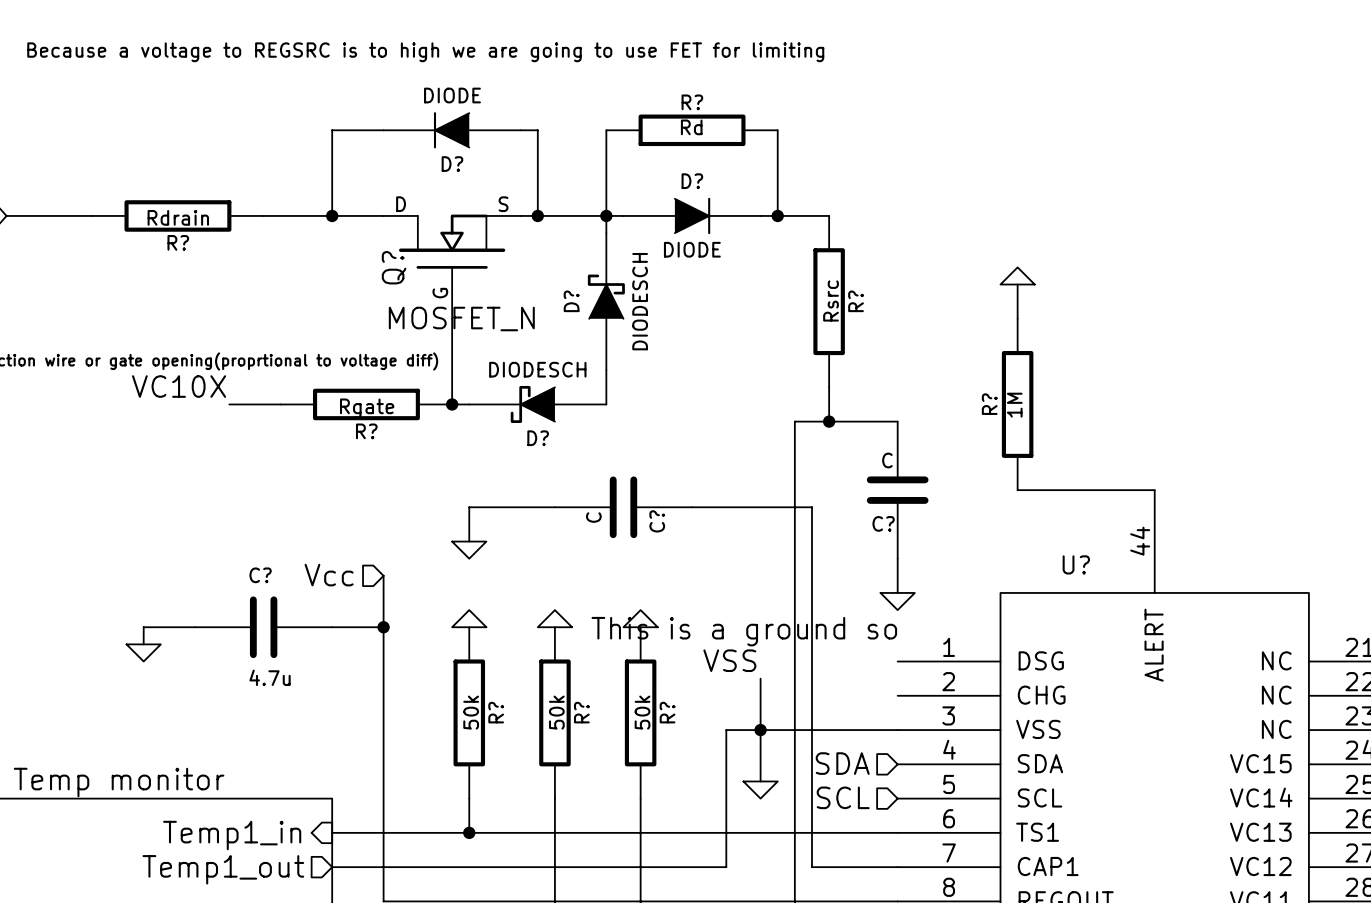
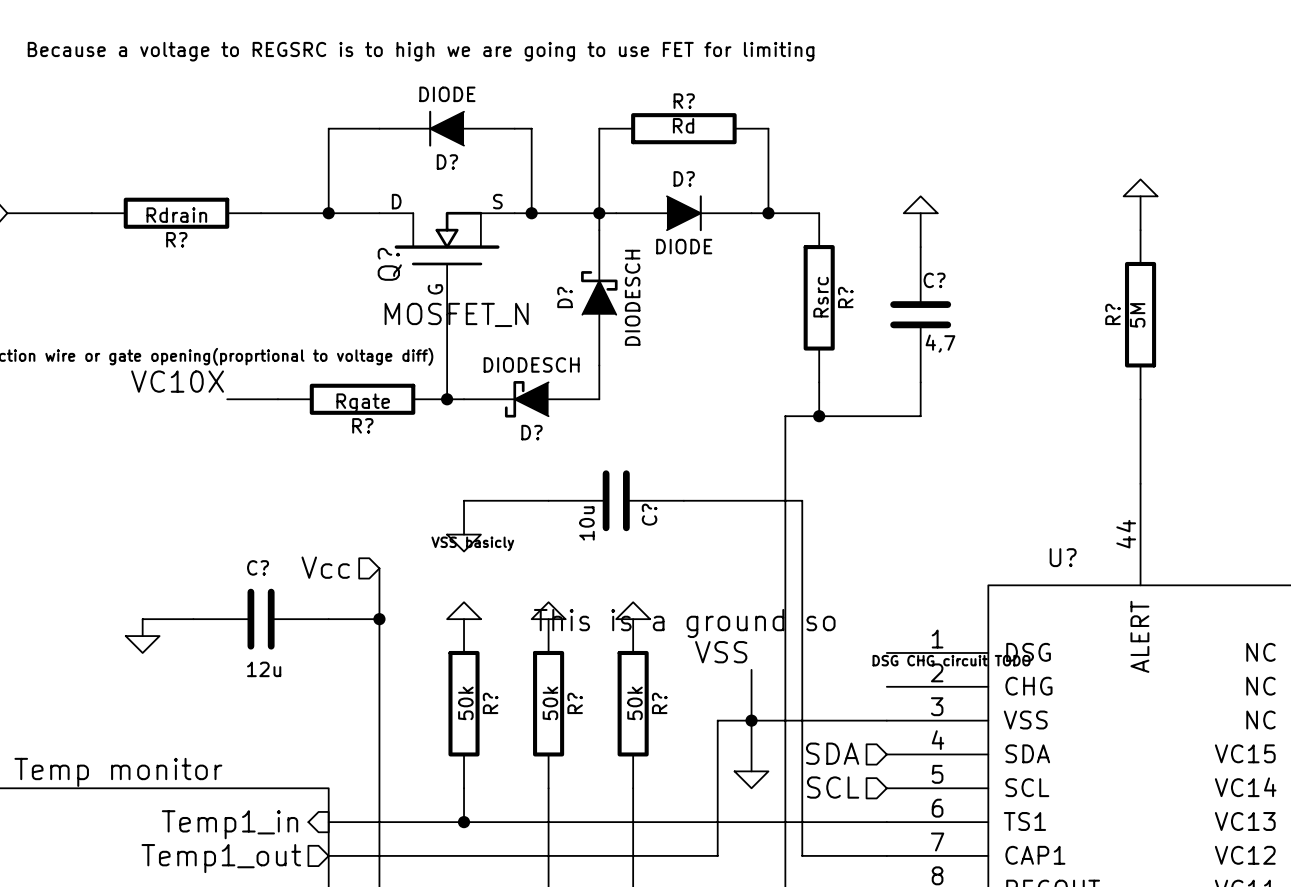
power symbol: none -> (1140, 187)
wire: none -> (1140, 196) (1140, 230)
power symbol: none -> (920, 204)
power symbol: (1017, 275) -> none
wire: (1017, 284) (1017, 318) -> (920, 213) (920, 247)
C?: none -> 4,7 (920, 314)
R?: none -> 5M (1140, 314)
wire: none -> (920, 382) (920, 416) (886, 416)
R?: 1M (1017, 404) -> none
C?: C (897, 490) -> none
wire: (1017, 490) (1154, 490) -> (1140, 399) (1140, 483)
C? value: C (593, 517) -> 10u (586, 523)
text: none -> VSS basicly (472, 543)
wire: (897, 558) (897, 592) -> none
power symbol: (897, 601) -> none
text position: This is a ground so (744, 631) -> This is a ground so (684, 623)
text: none -> DSG CHG circuit TODO (951, 660)
C? value: 4.7u (270, 677) -> 12u (264, 669)

